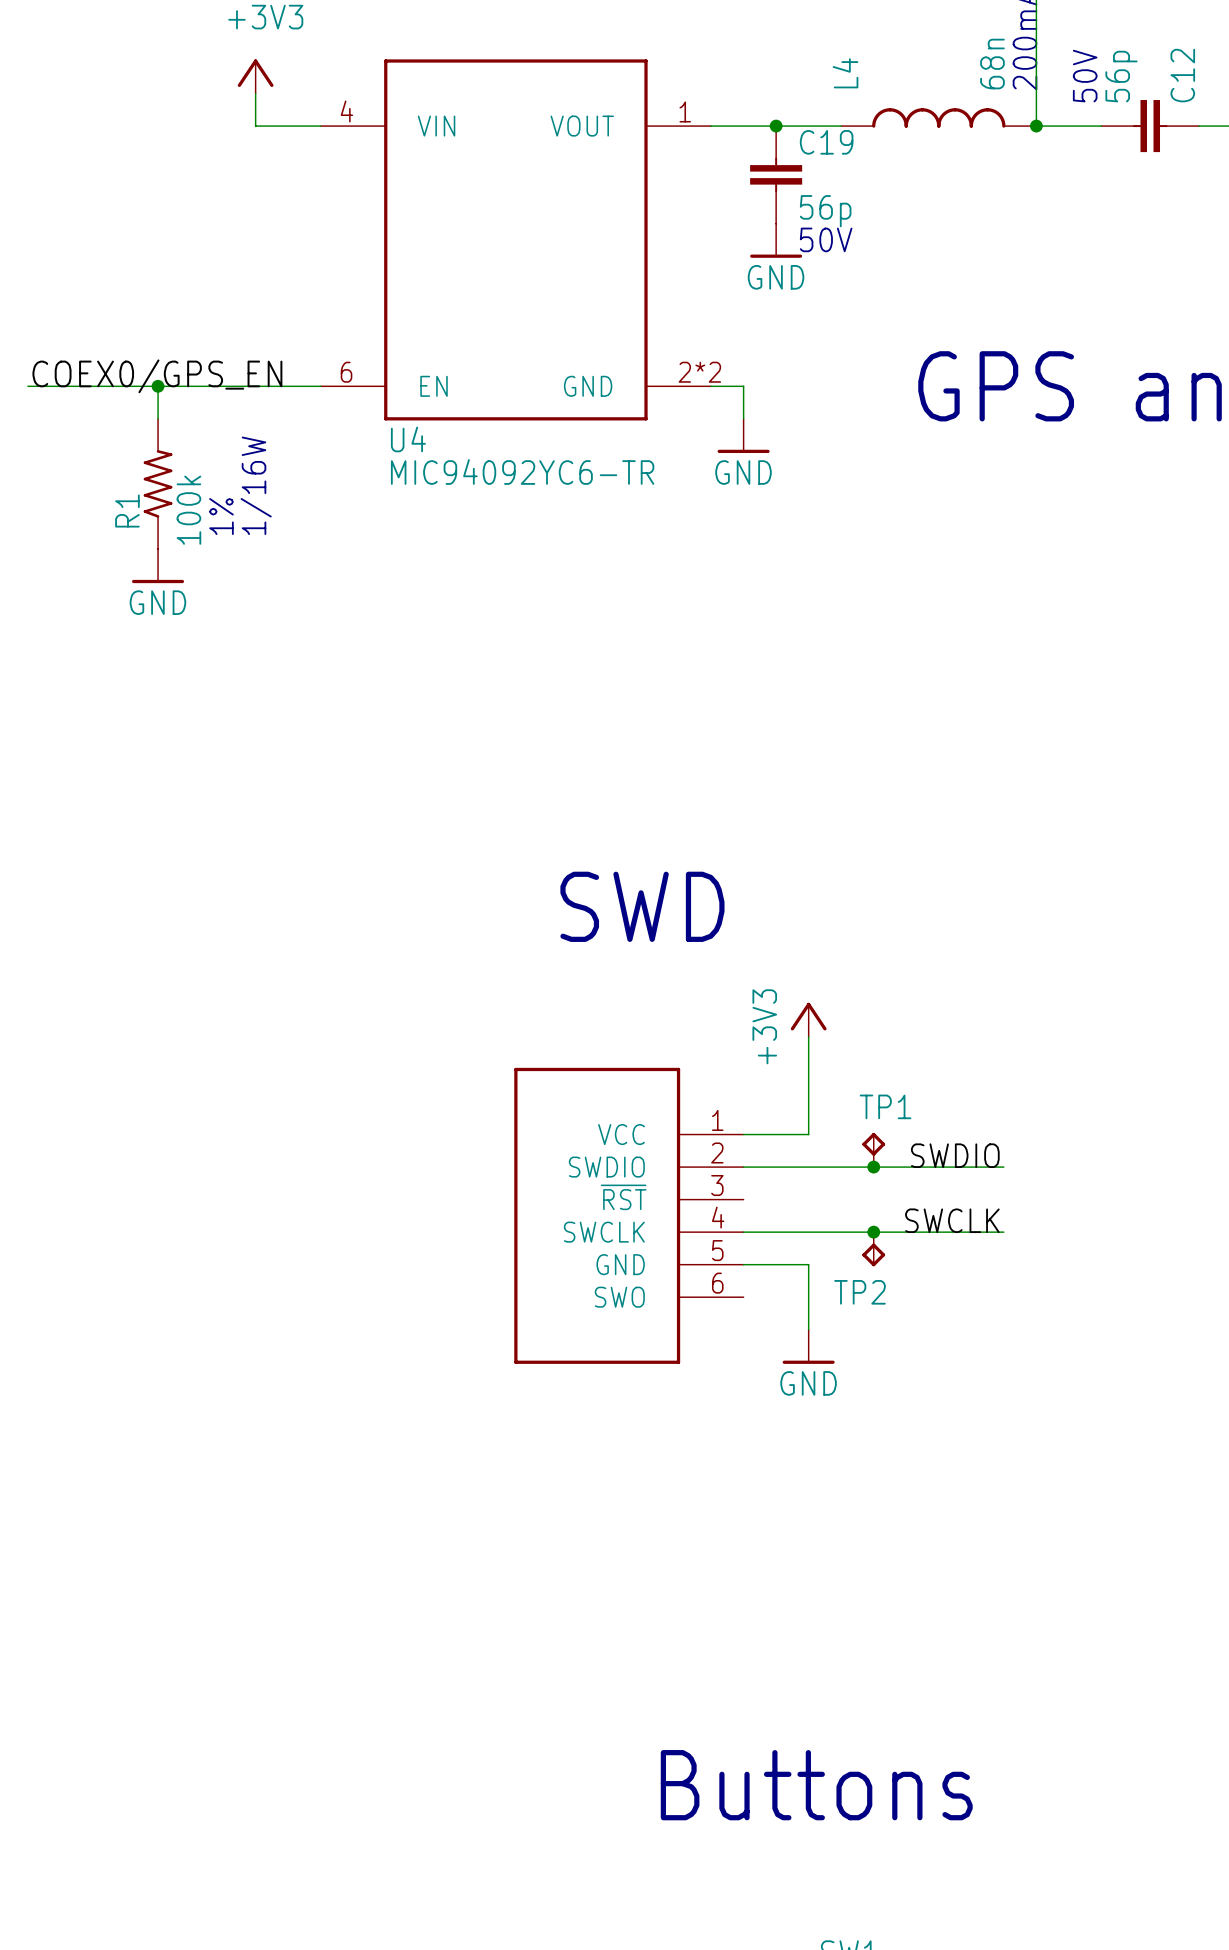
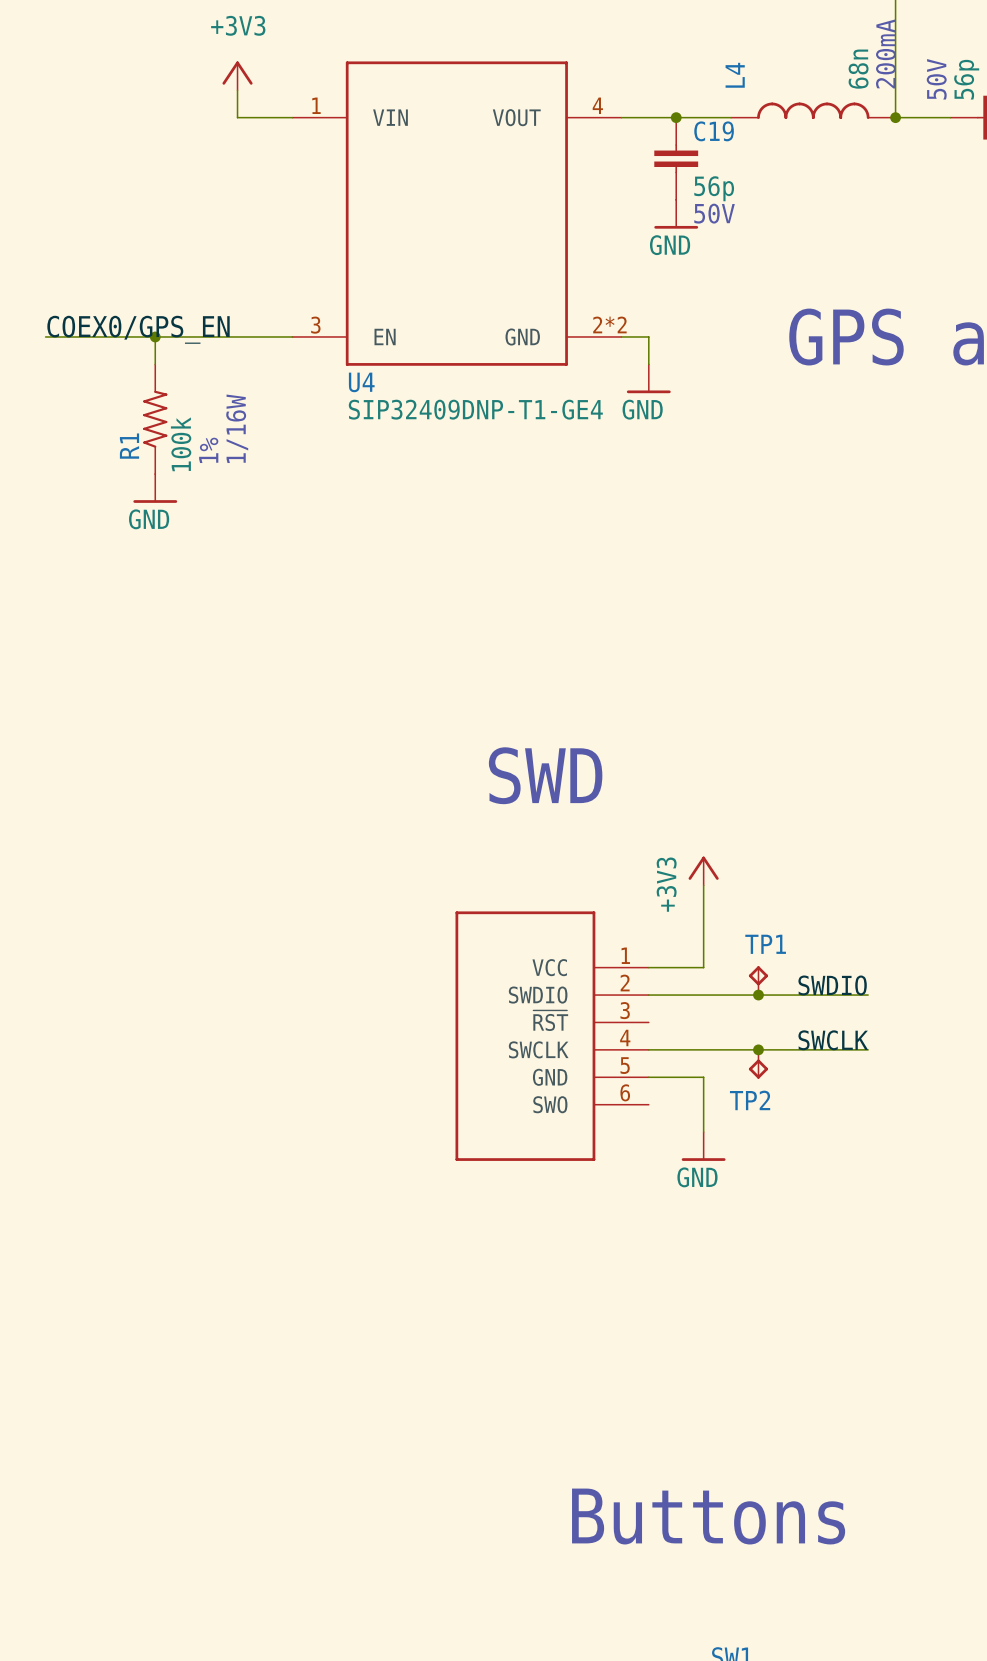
U4 pin number: 4 (346, 111) -> 1 (316, 105)
U4 pin number: 1 (685, 111) -> 4 (597, 105)
U4 pin number: 6 (346, 372) -> 3 (315, 325)
U4 text: MIC94092YC6-TR (522, 471) -> SIP32409DNP-T1-GE4 (475, 409)

